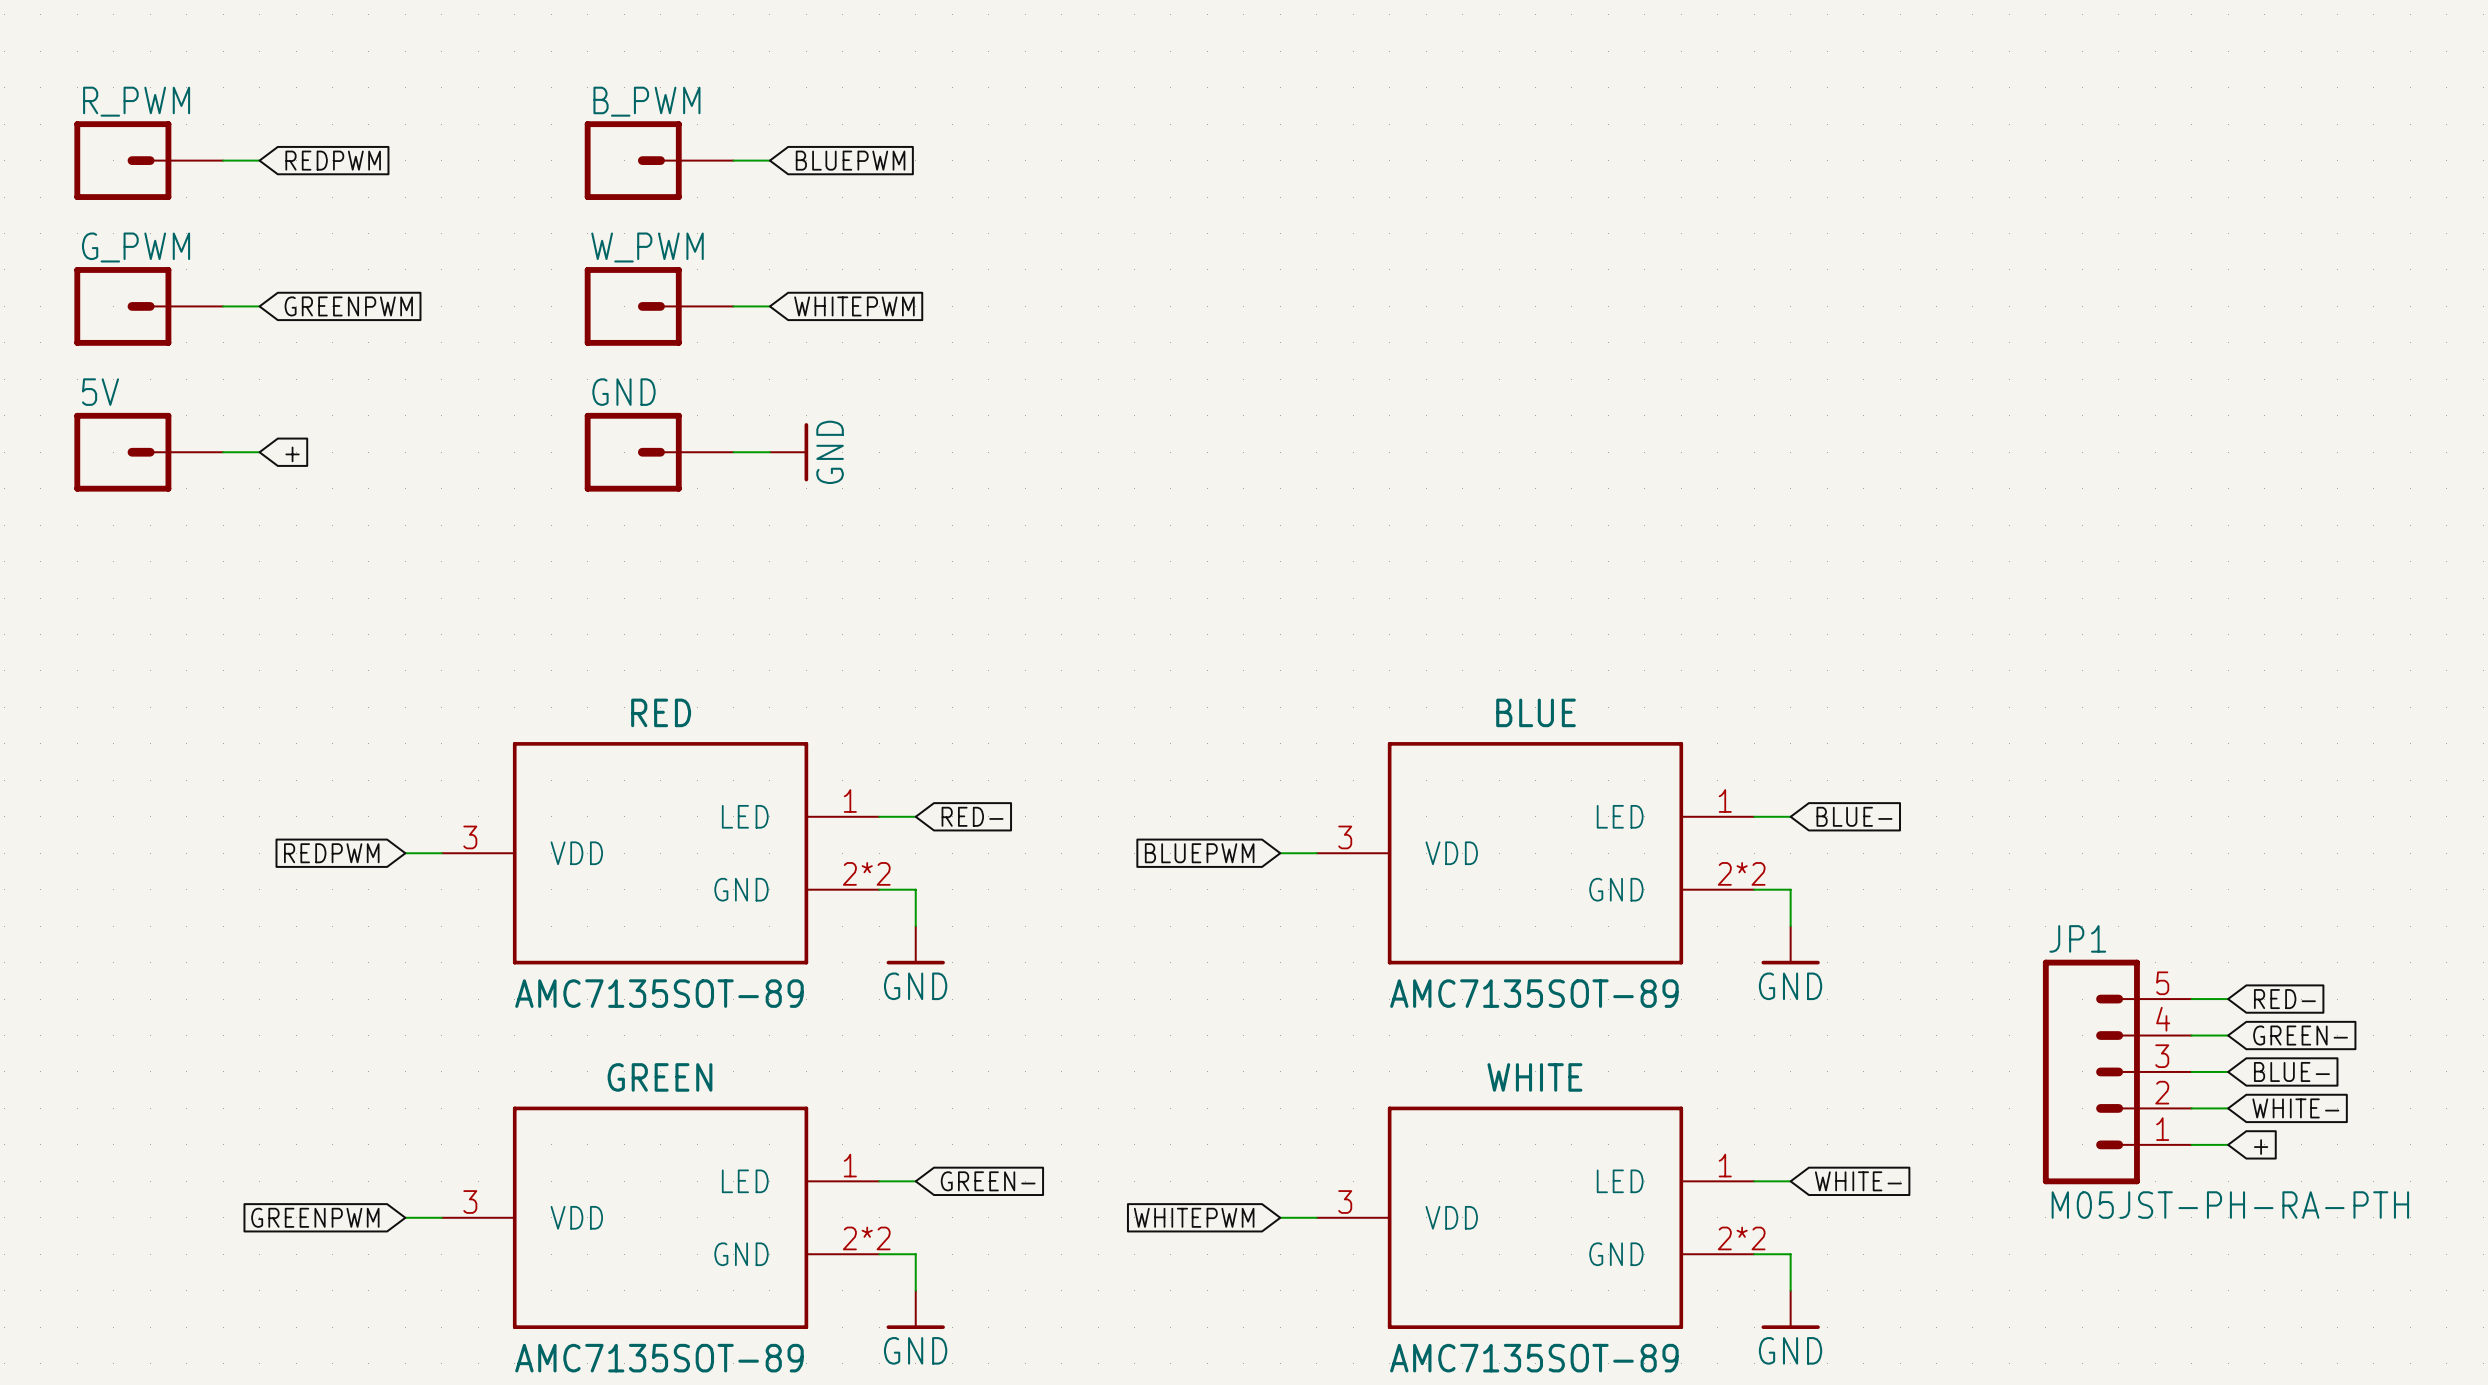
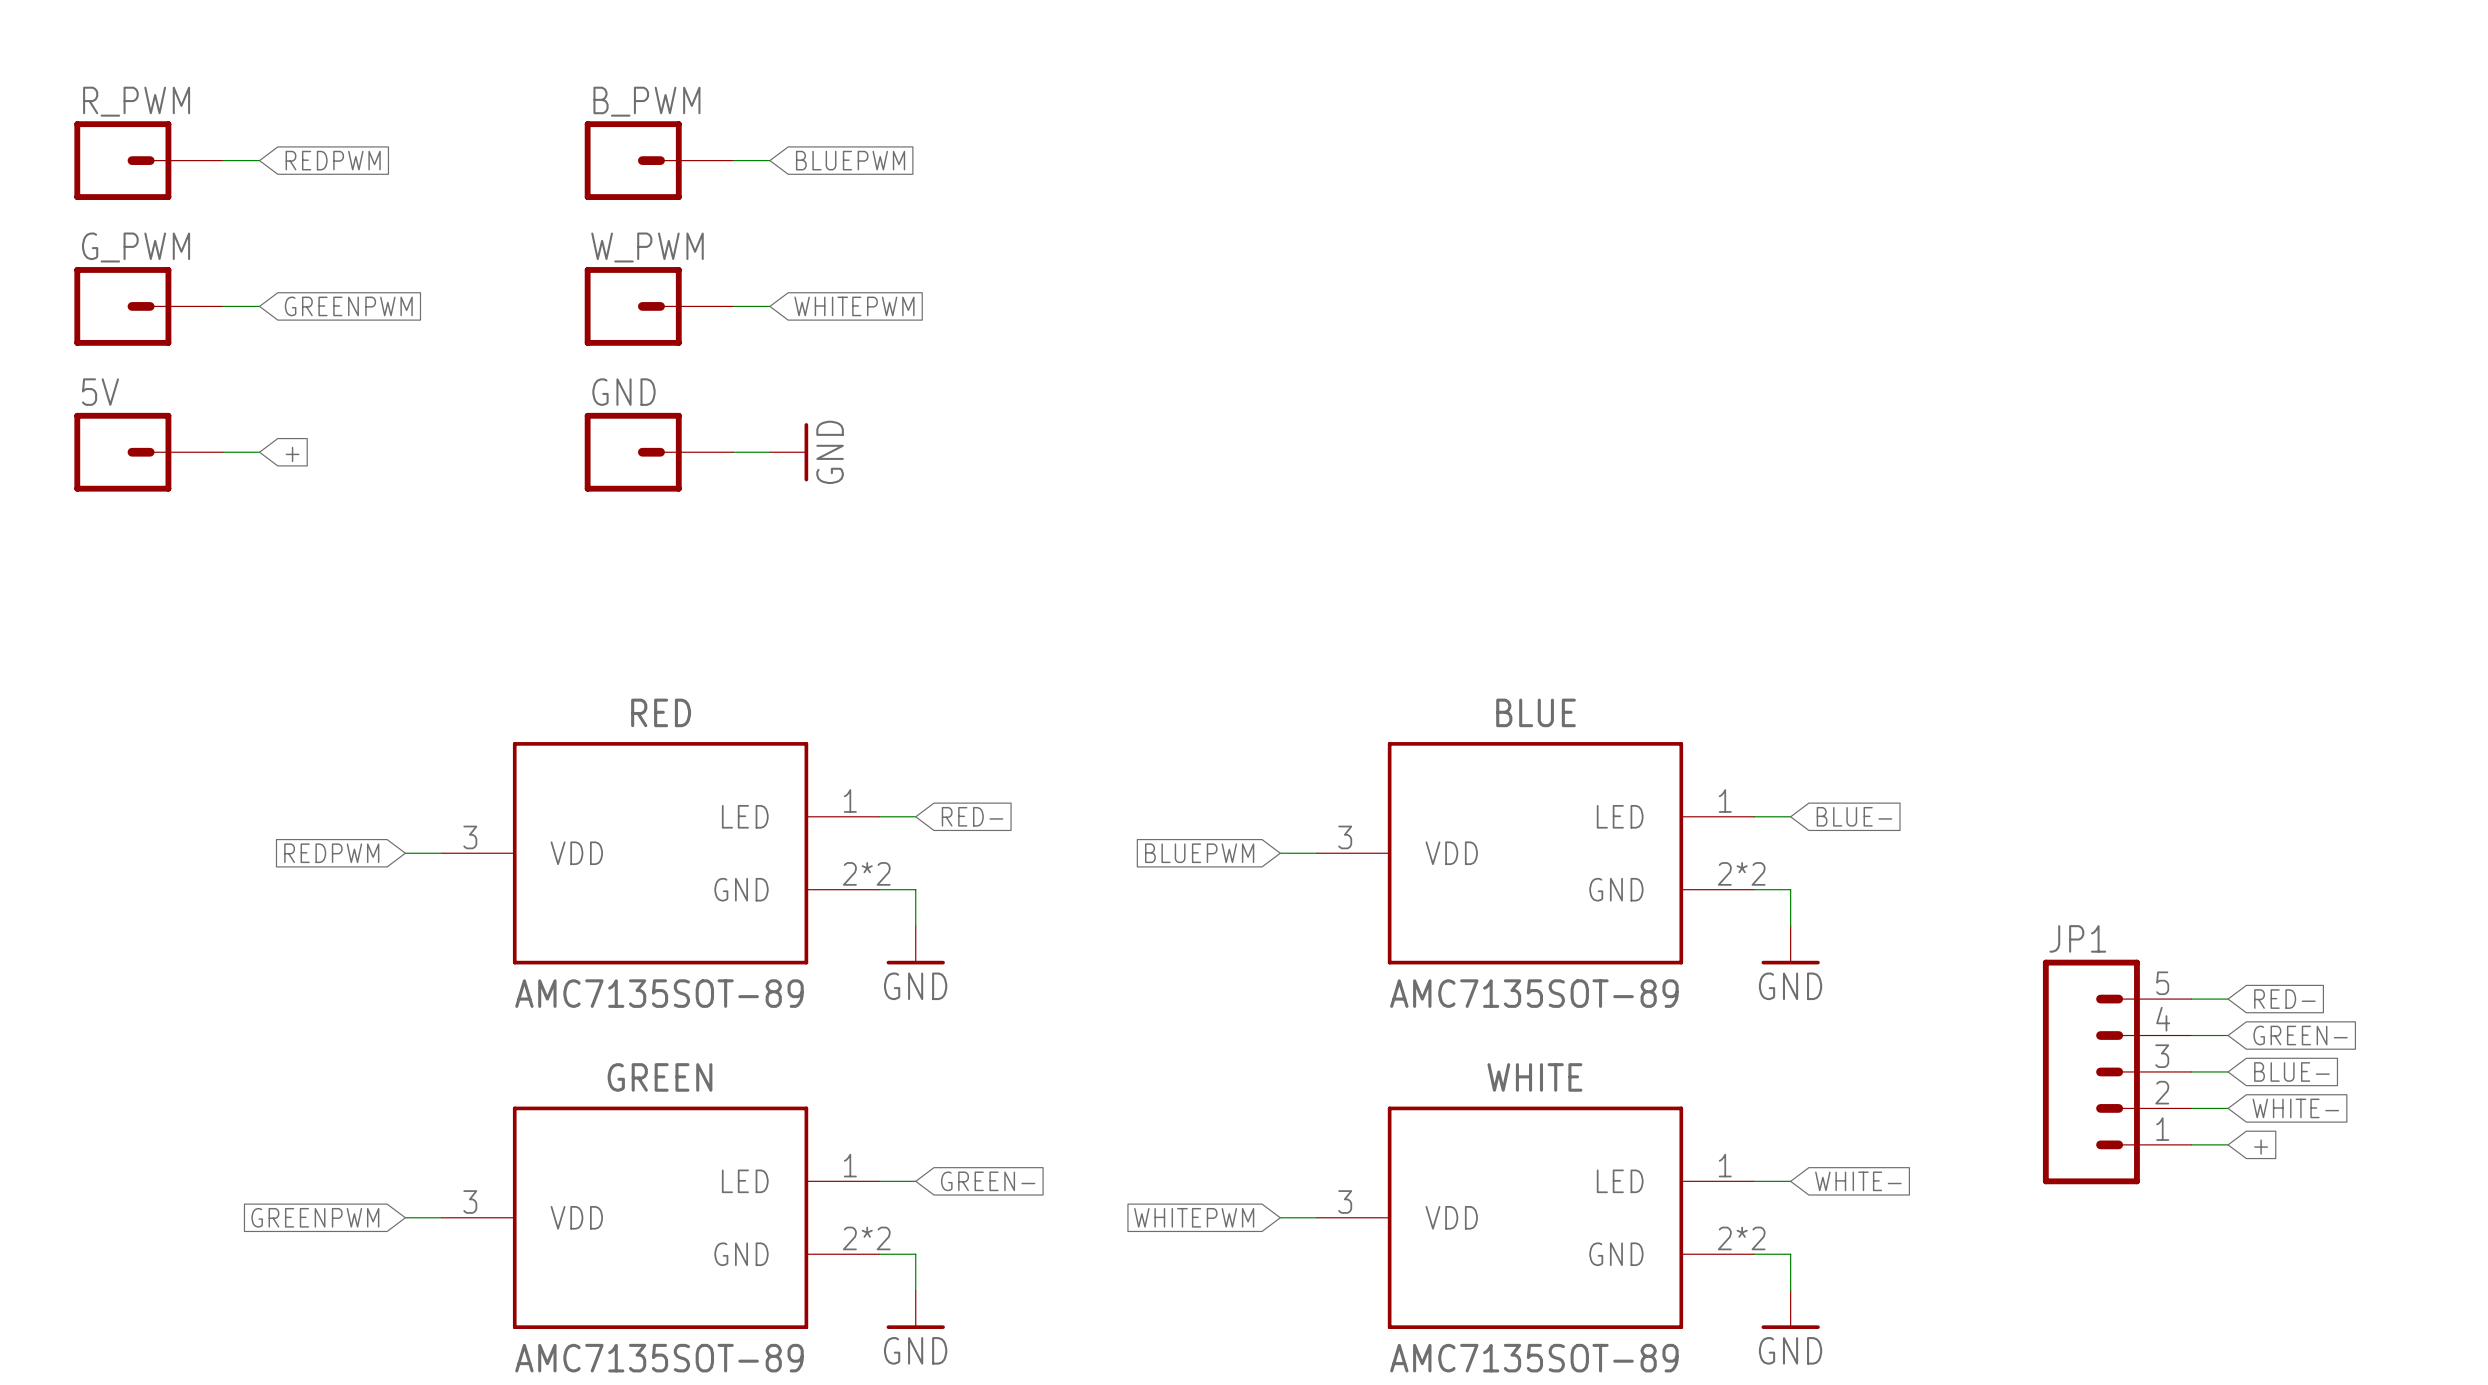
JP1 value: M05JST-PH-RA-PTH (2230, 1205) -> none

